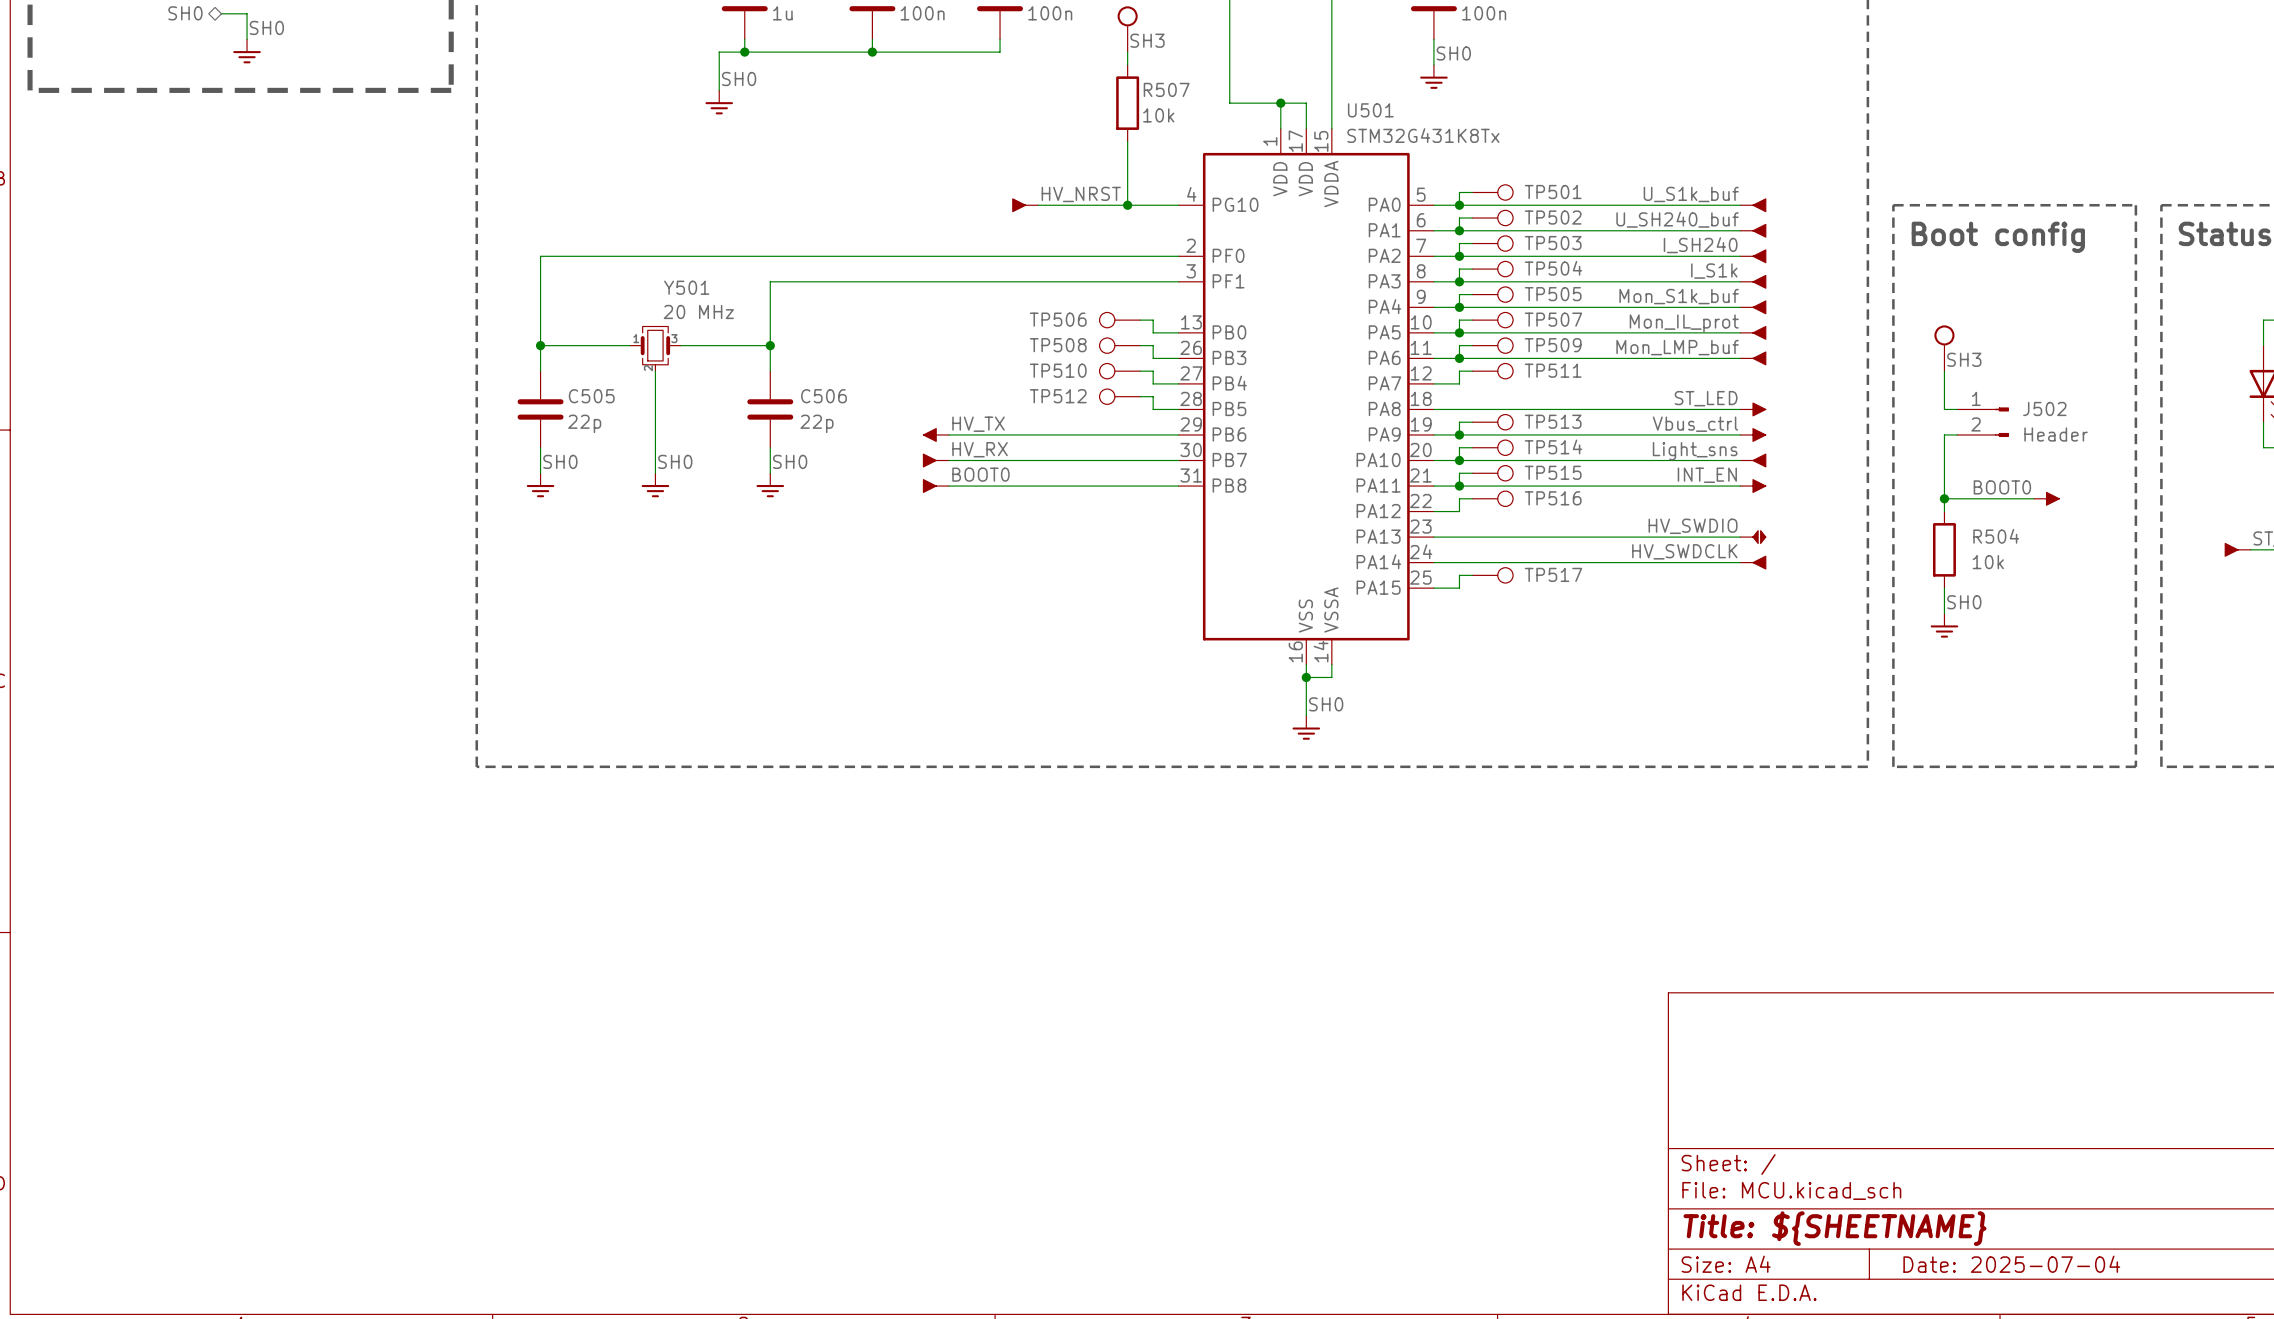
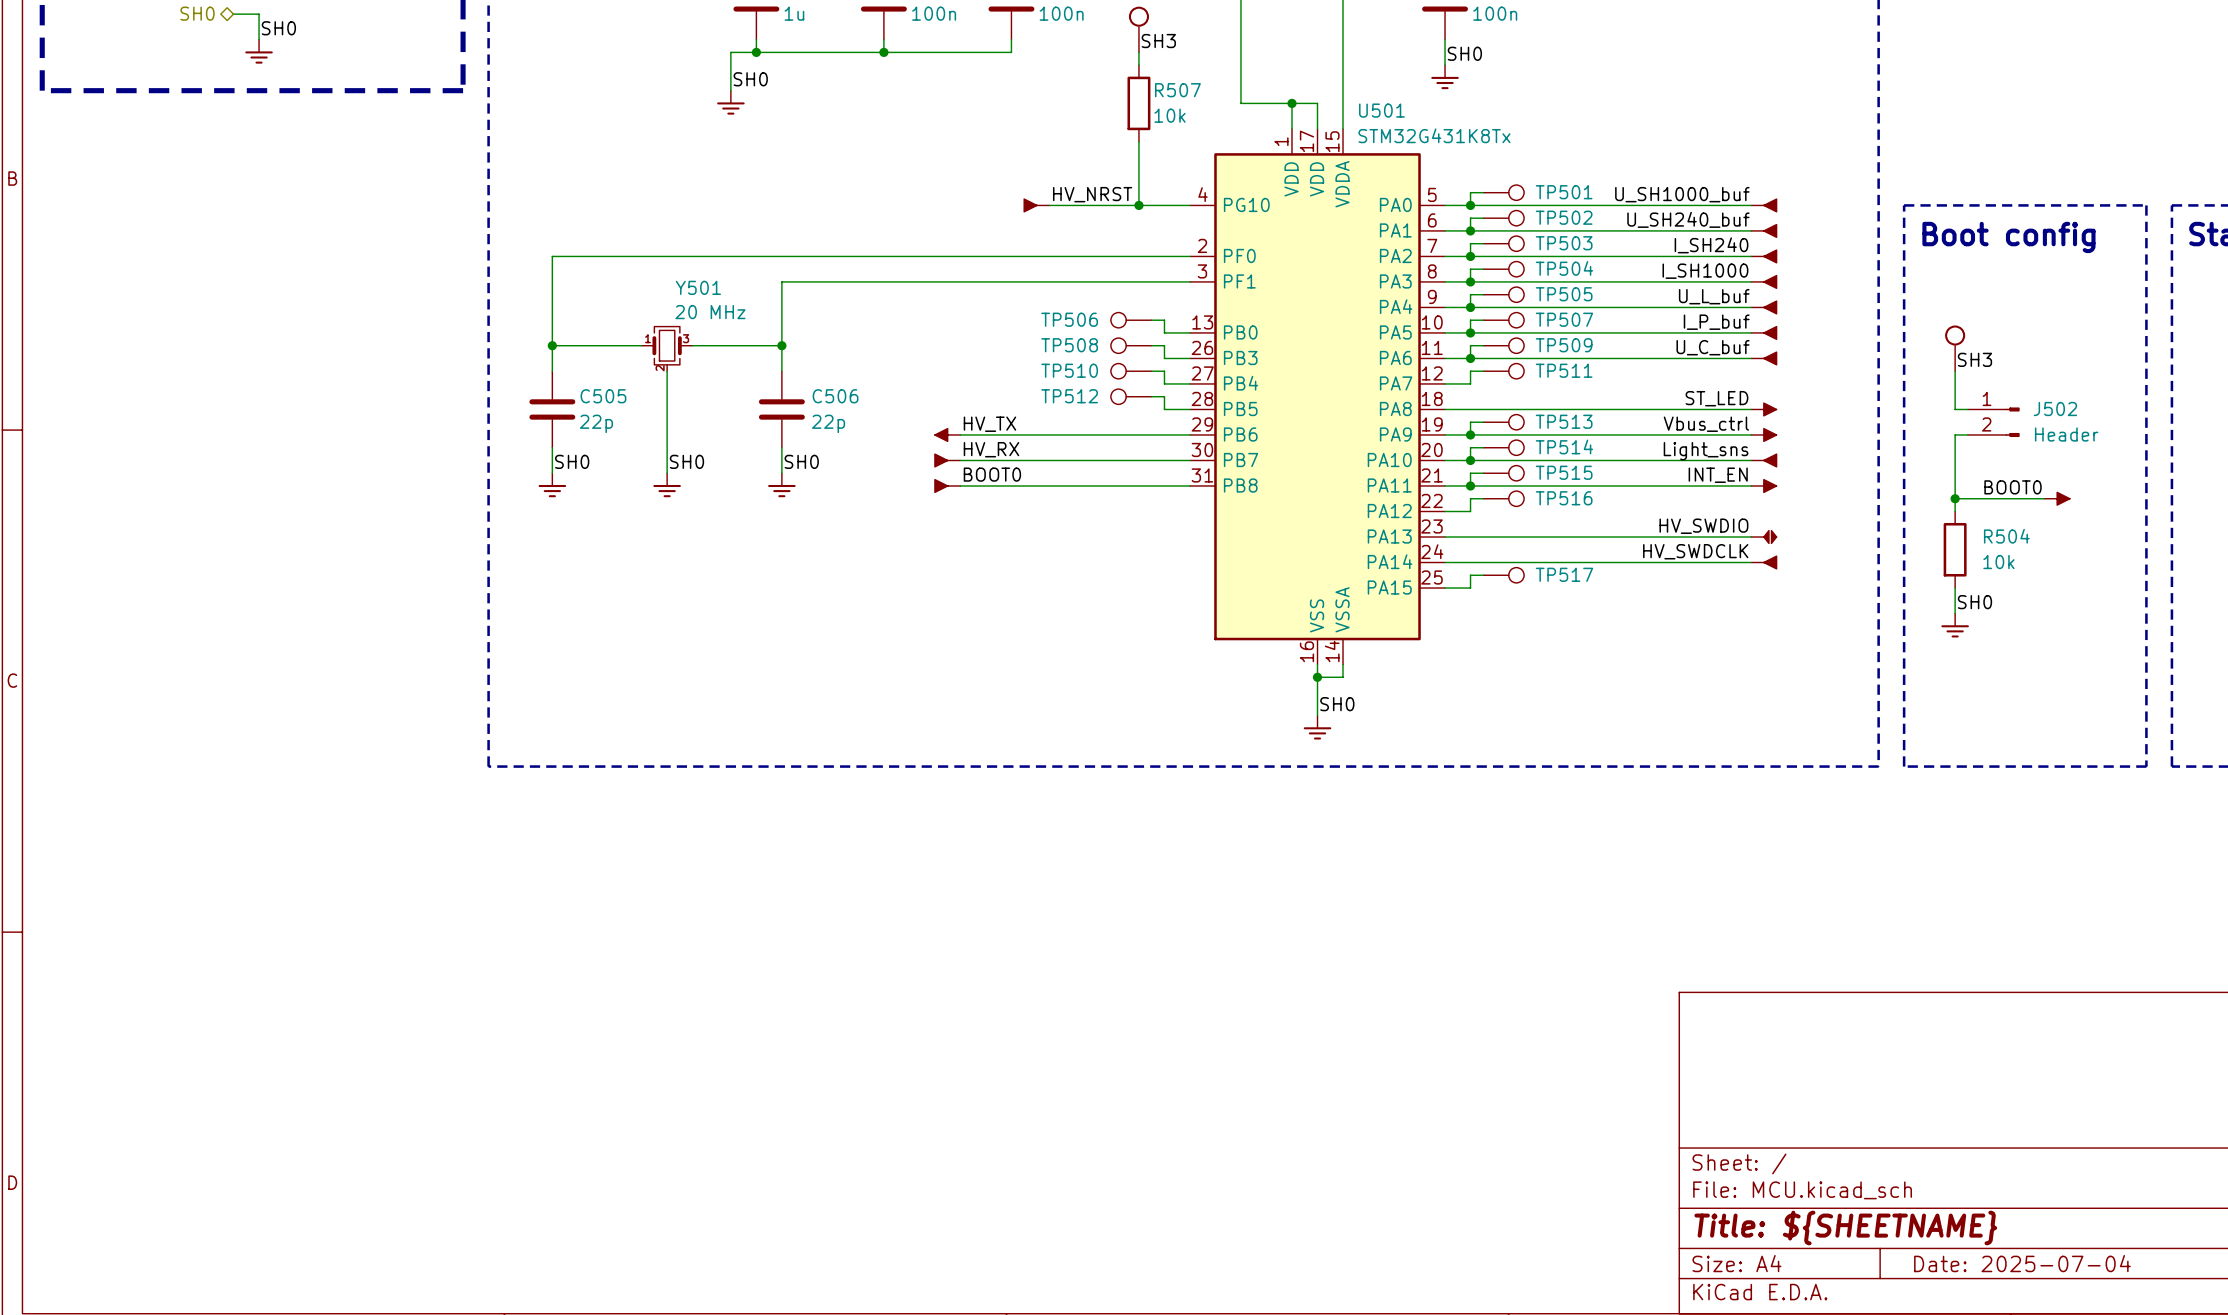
label: U_S1k_buf (1691, 194) -> U_SH1000_buf (1682, 194)
label: I_S1k (1714, 271) -> I_SH1000 (1705, 271)
label: Mon_S1k_buf (1679, 296) -> U_L_buf (1714, 296)
label: Mon_IL_prot (1684, 323) -> I_P_buf (1716, 322)
label: Mon_LMP_buf (1677, 347) -> U_C_buf (1713, 347)

